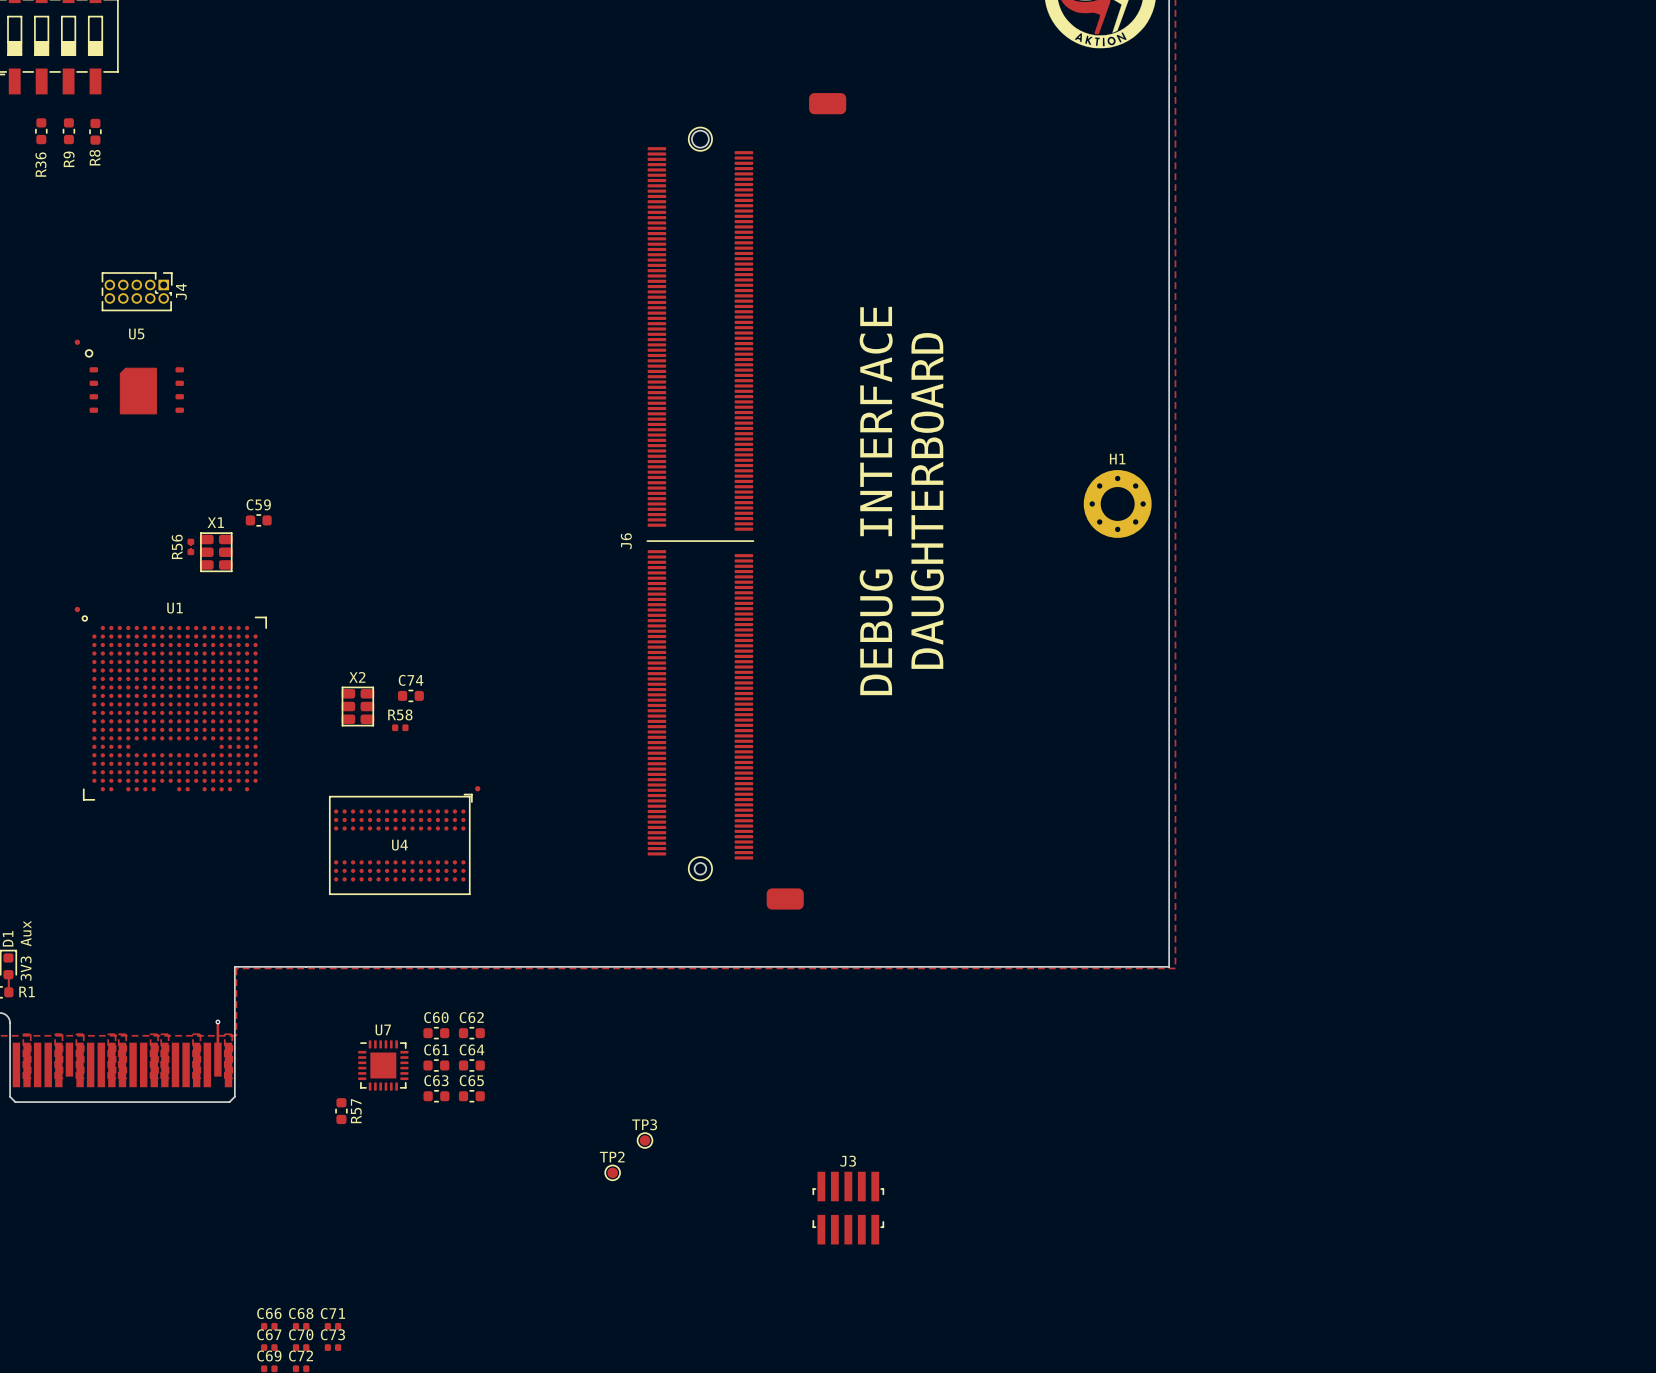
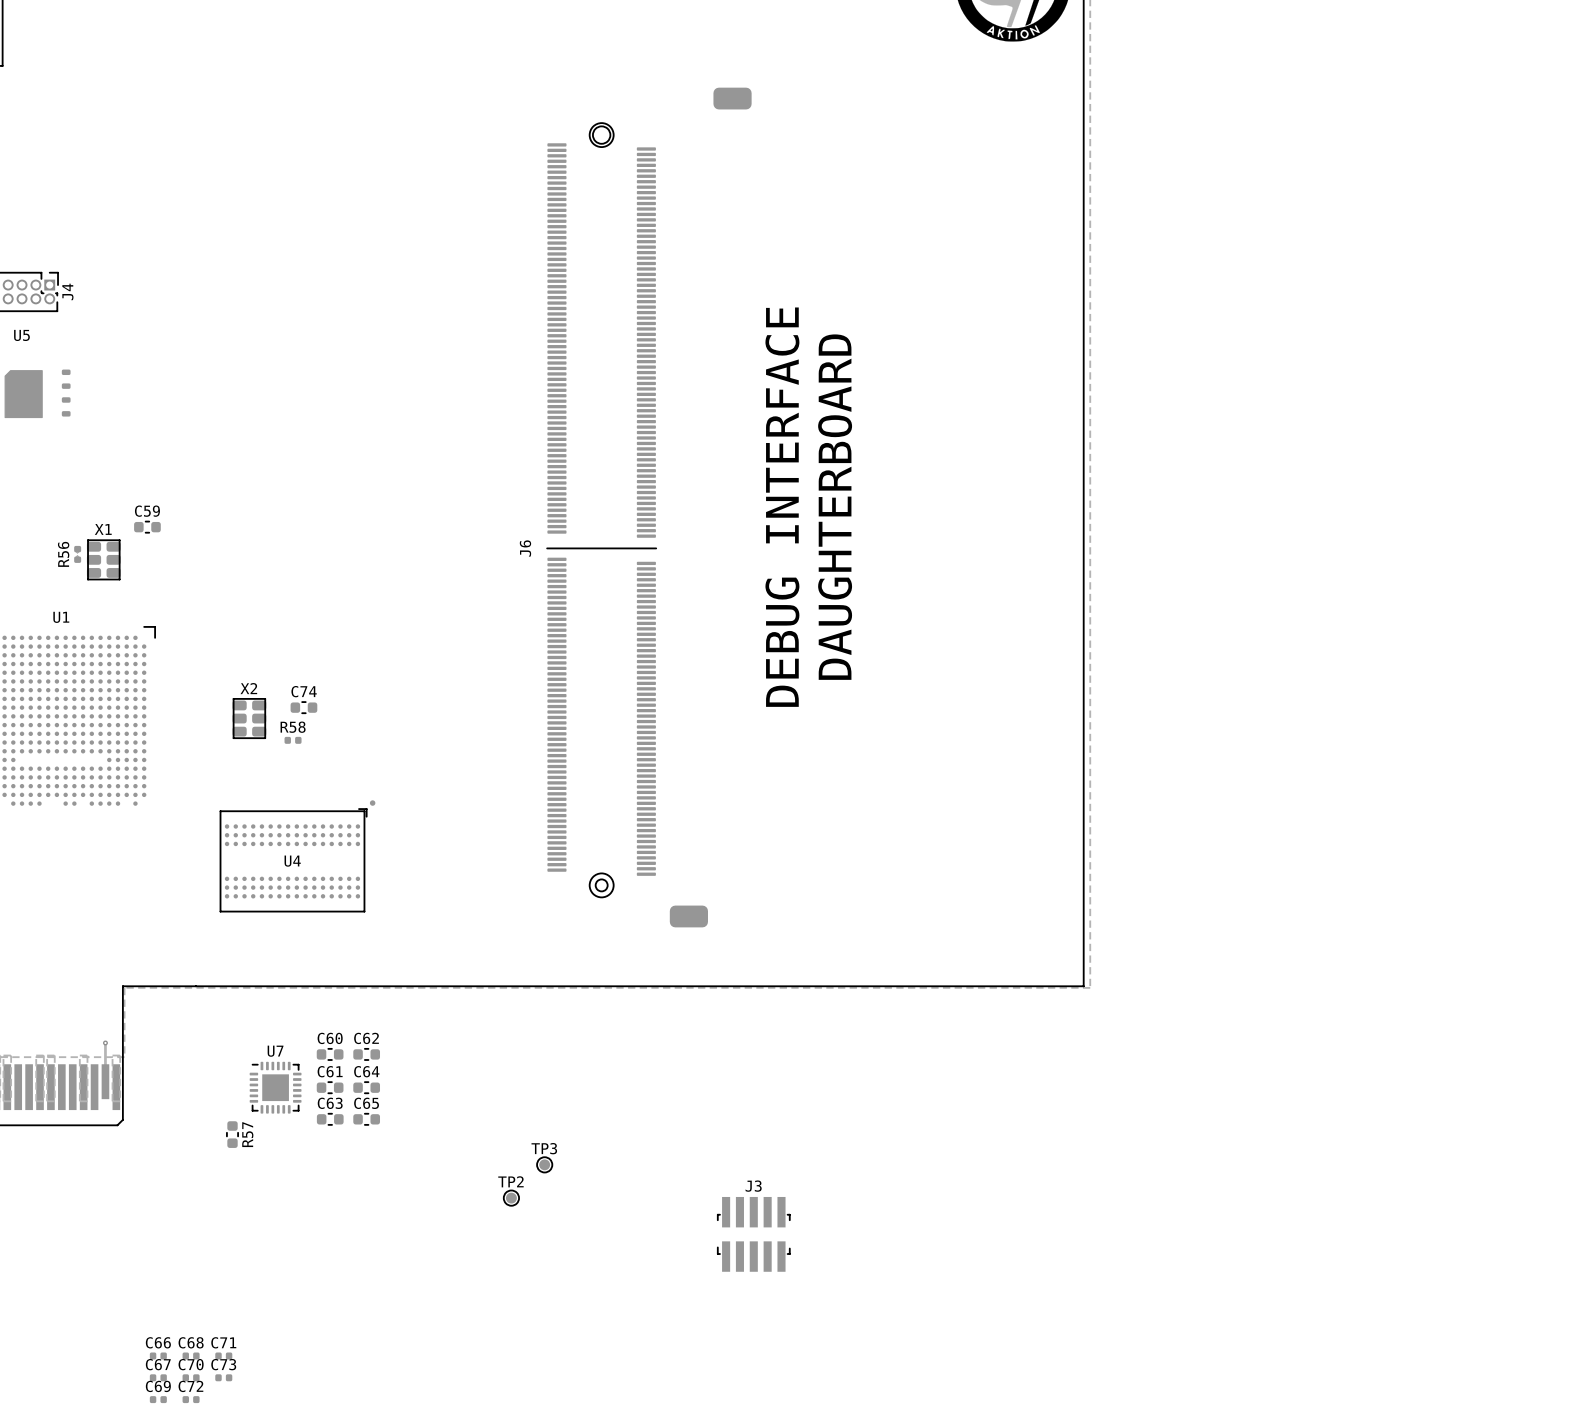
H1: (1117, 503) -> none

